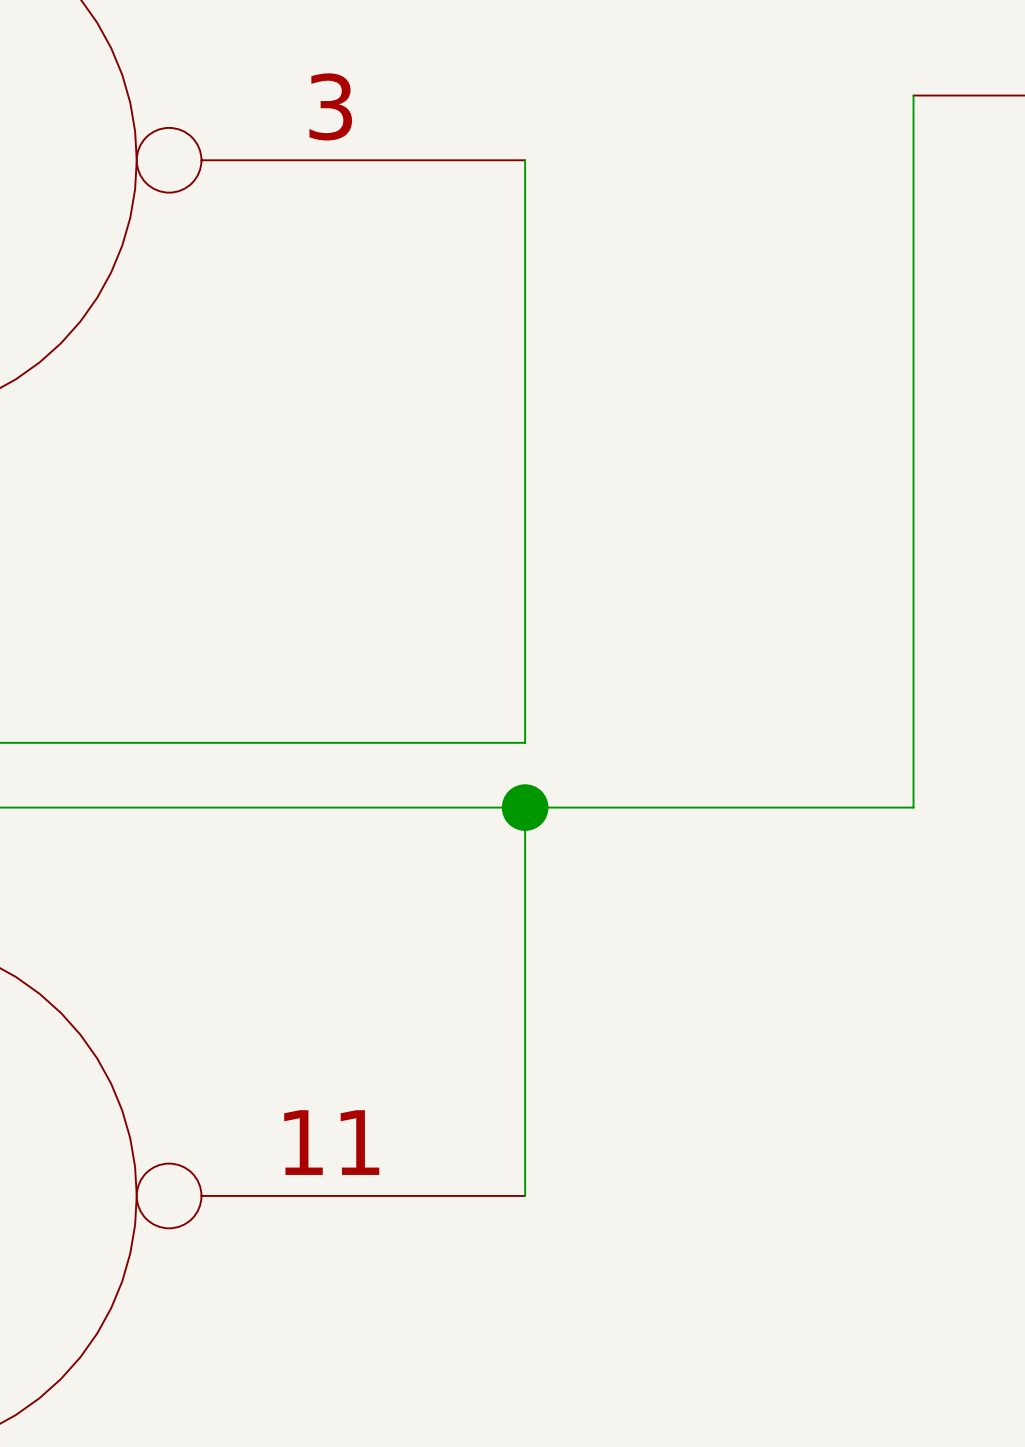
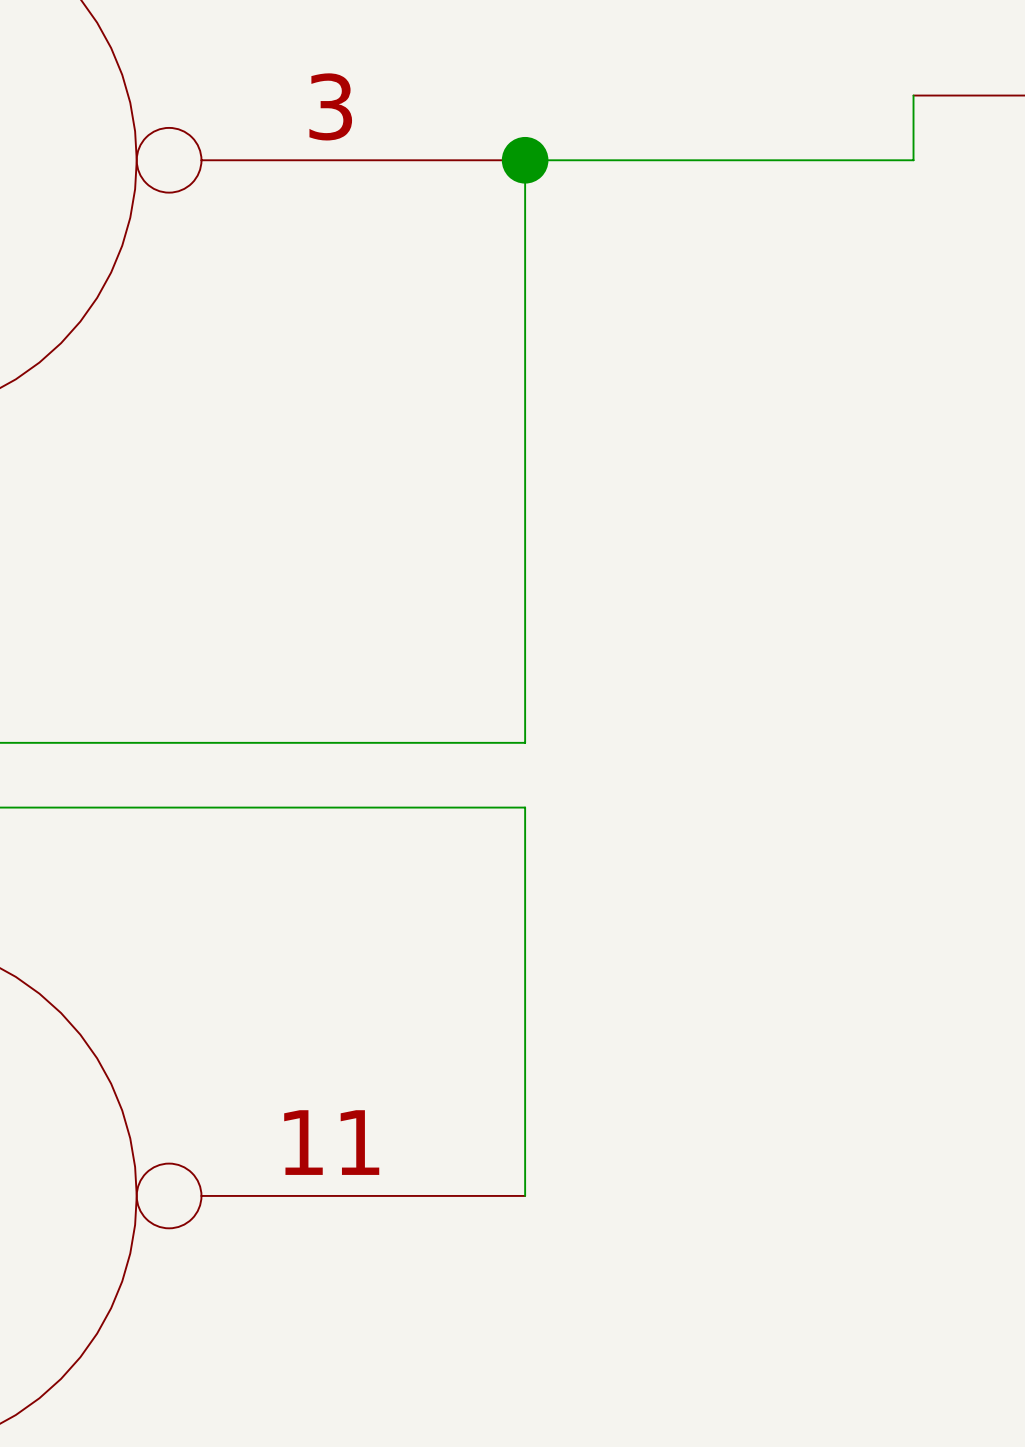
junction: none -> (525, 160)
wire: (913, 160) (913, 807) (525, 807) -> (913, 160) (525, 160)
junction: (525, 807) -> none

